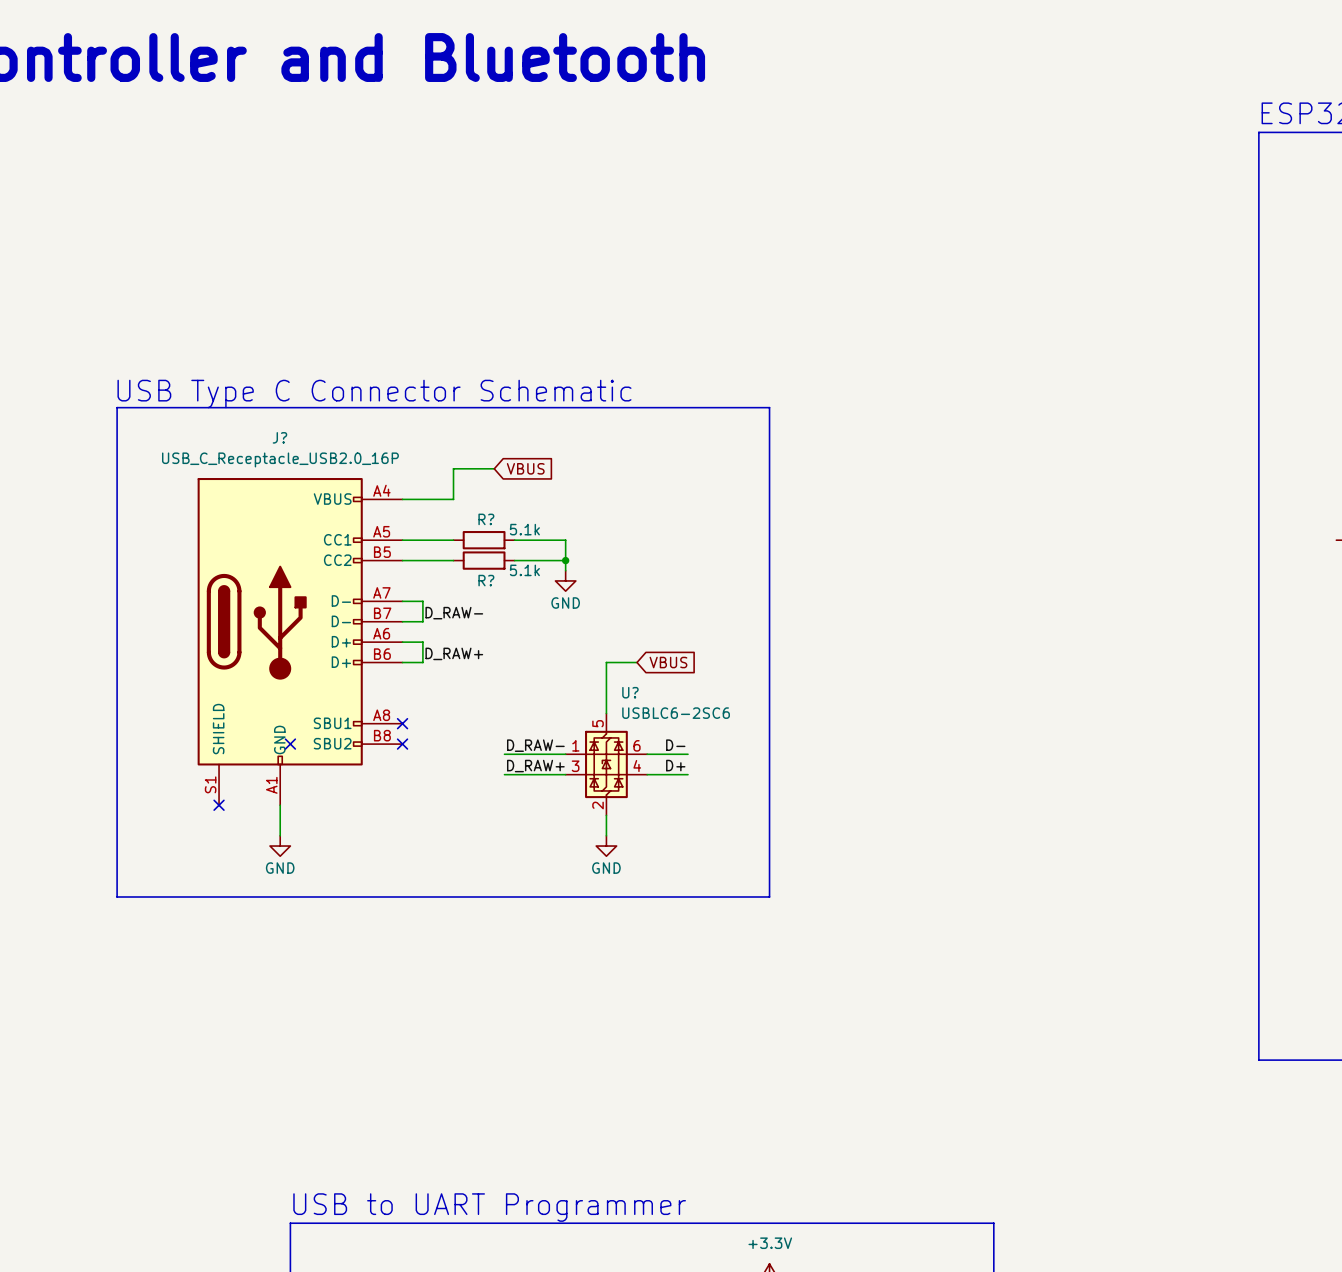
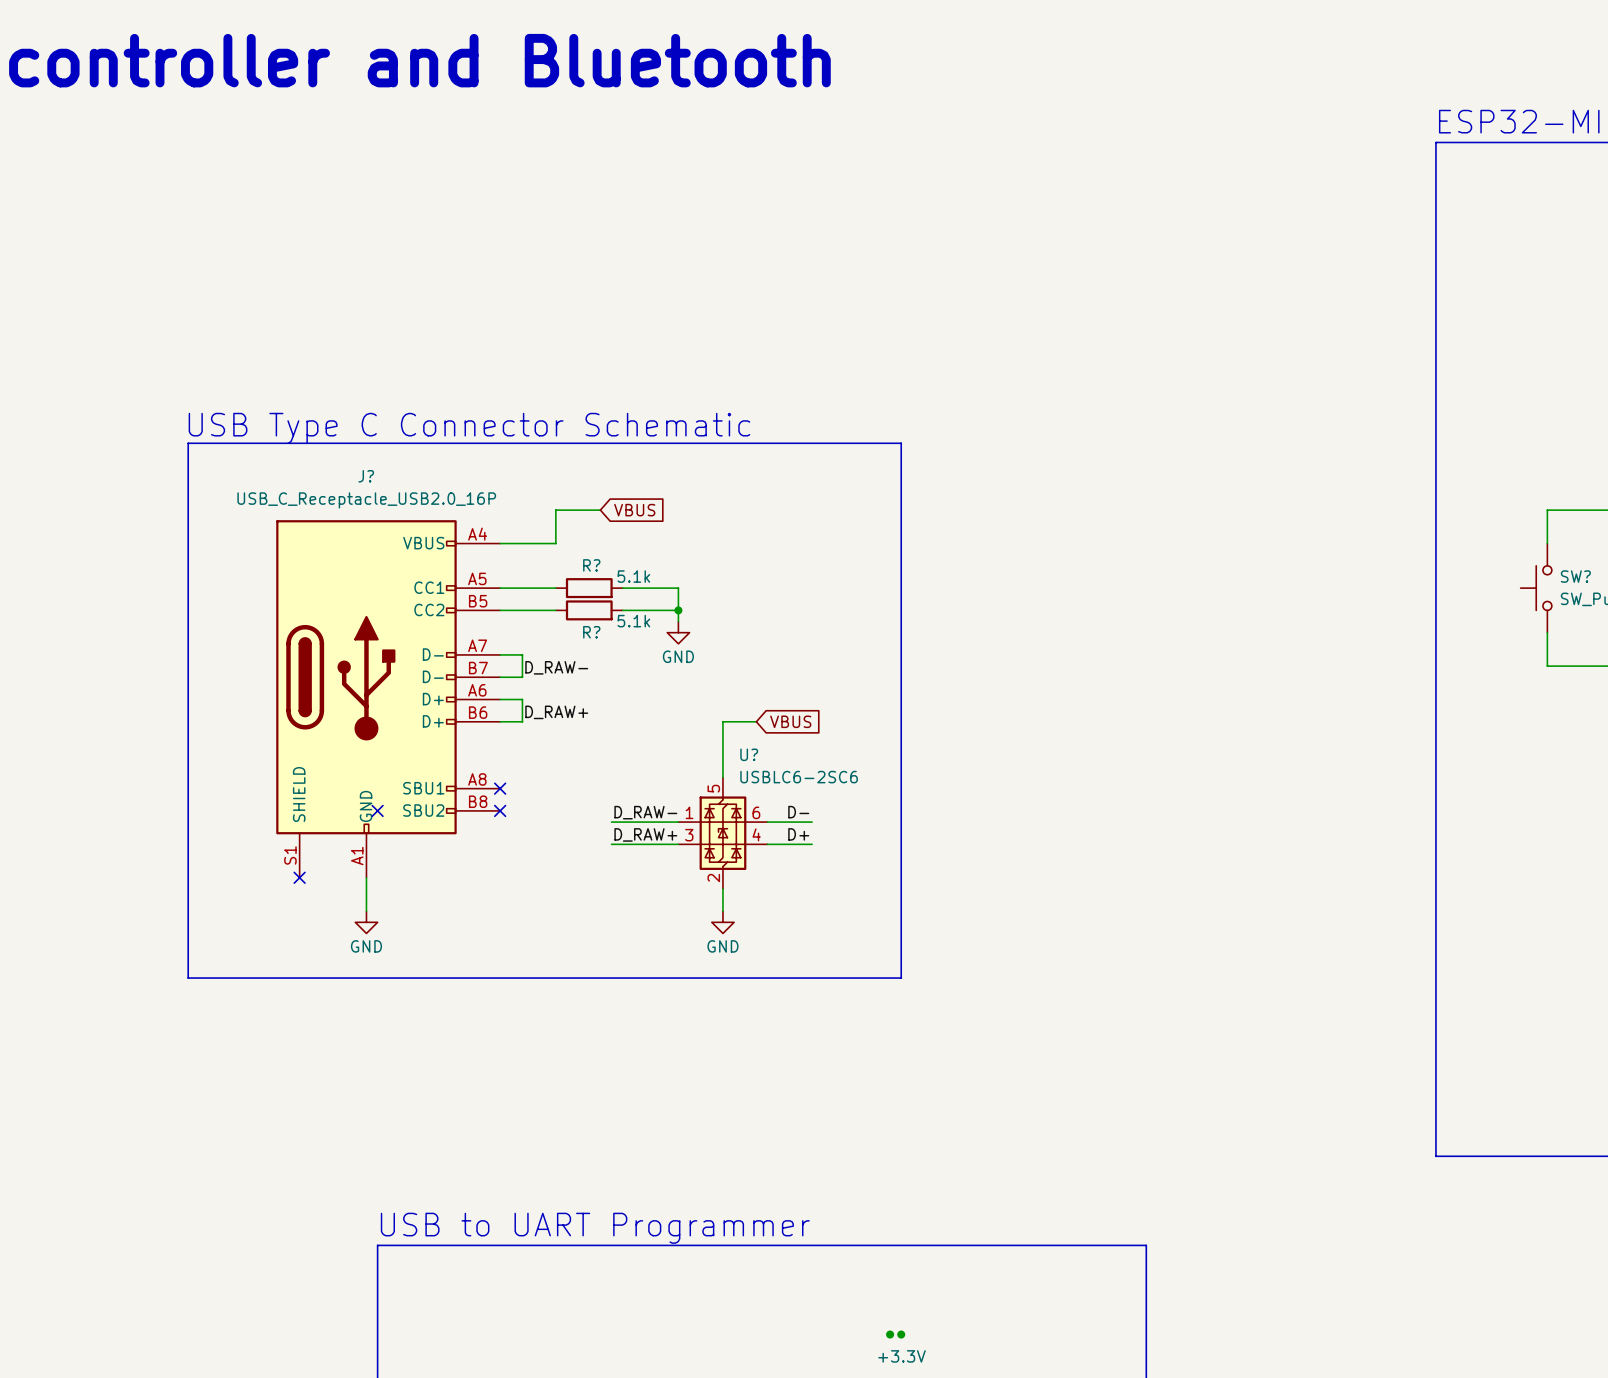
text position: USB to UART Programmer (489, 1207) -> USB to UART Programmer (595, 1228)
line: (290, 1223) (993, 1223) -> (377, 1334) (377, 1245) (1146, 1245) (1146, 1334)
junction: none -> (890, 1334)
junction: none -> (901, 1334)

